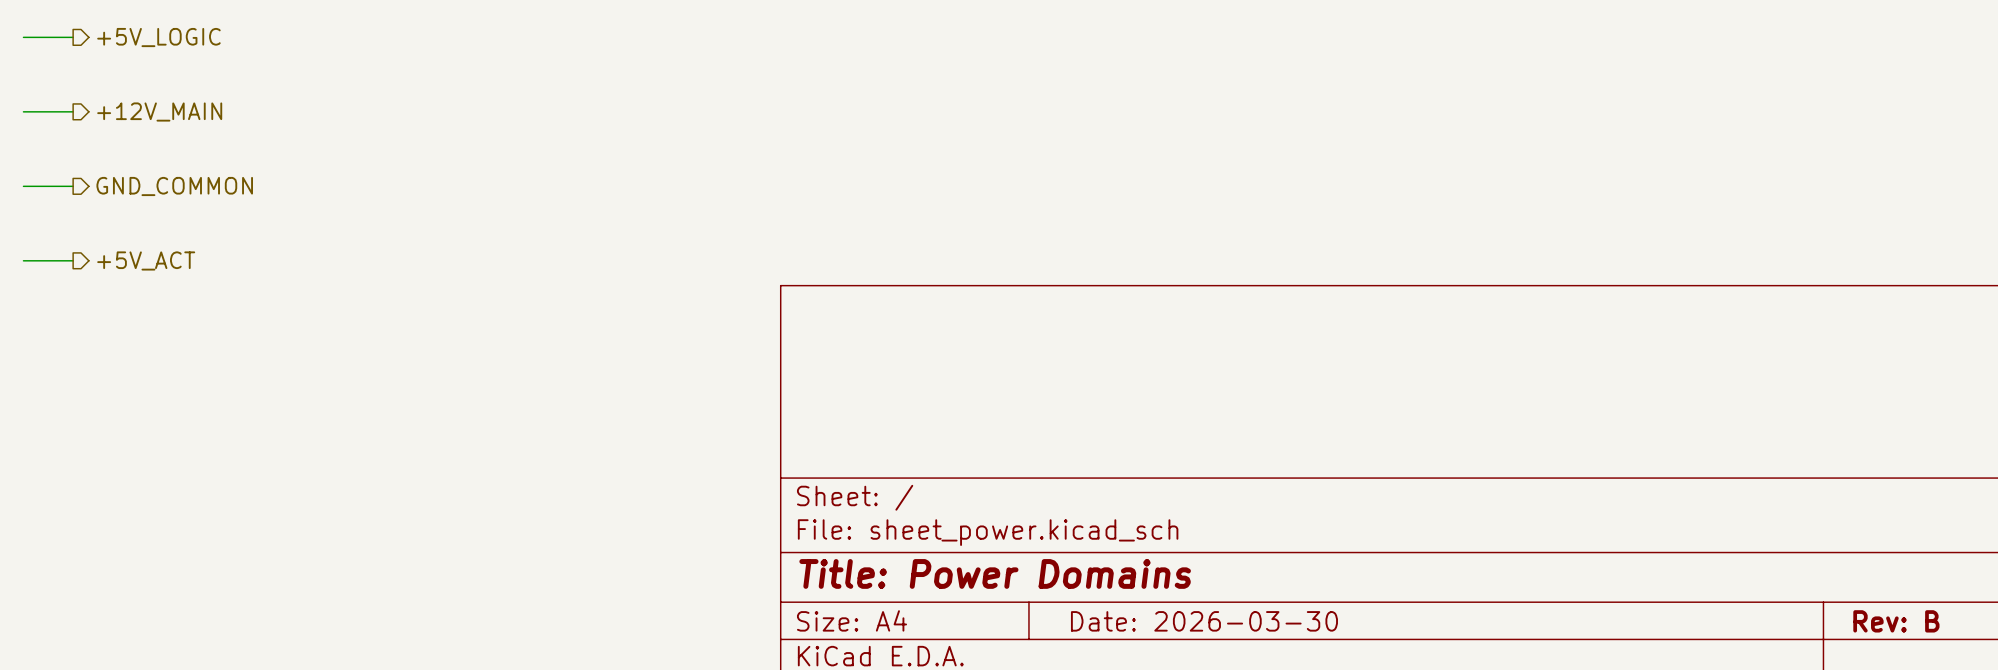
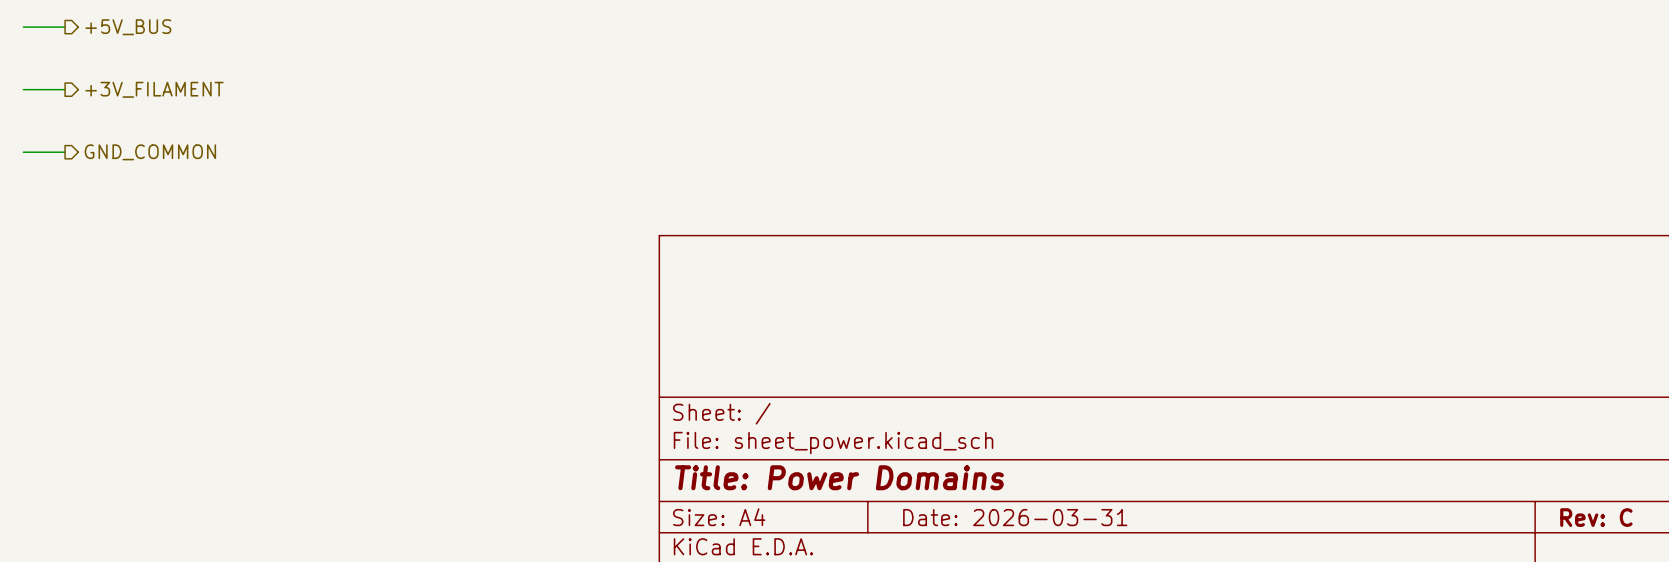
hierarchical label: +5V_LOGIC (158, 37) -> +5V_BUS (128, 27)
hierarchical label: +12V_MAIN (159, 112) -> +3V_FILAMENT (154, 89)
wire: (23, 260) (73, 260) -> none
hierarchical label: +5V_ACT (146, 260) -> none
title block: Date: 2026-03-30 (1204, 621) -> Date: 2026-03-31 (1015, 517)
title block: Rev: B (1896, 621) -> Rev: C (1596, 517)

